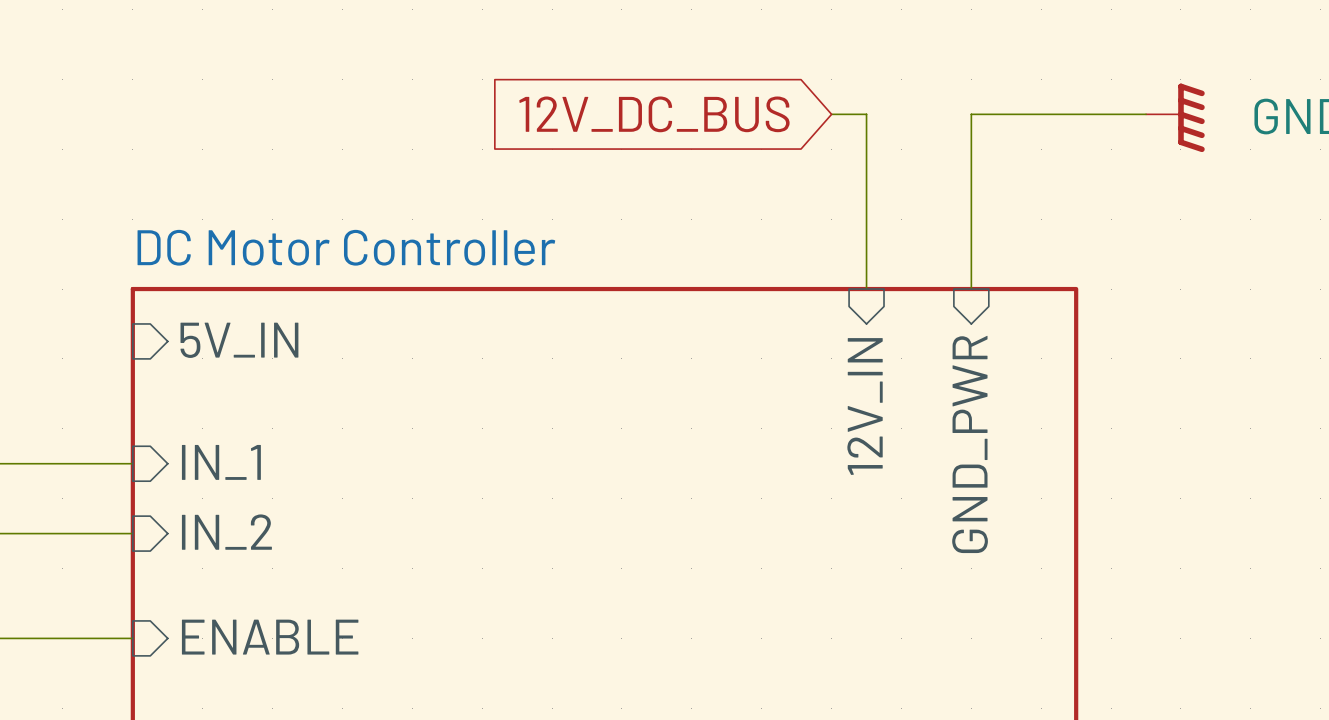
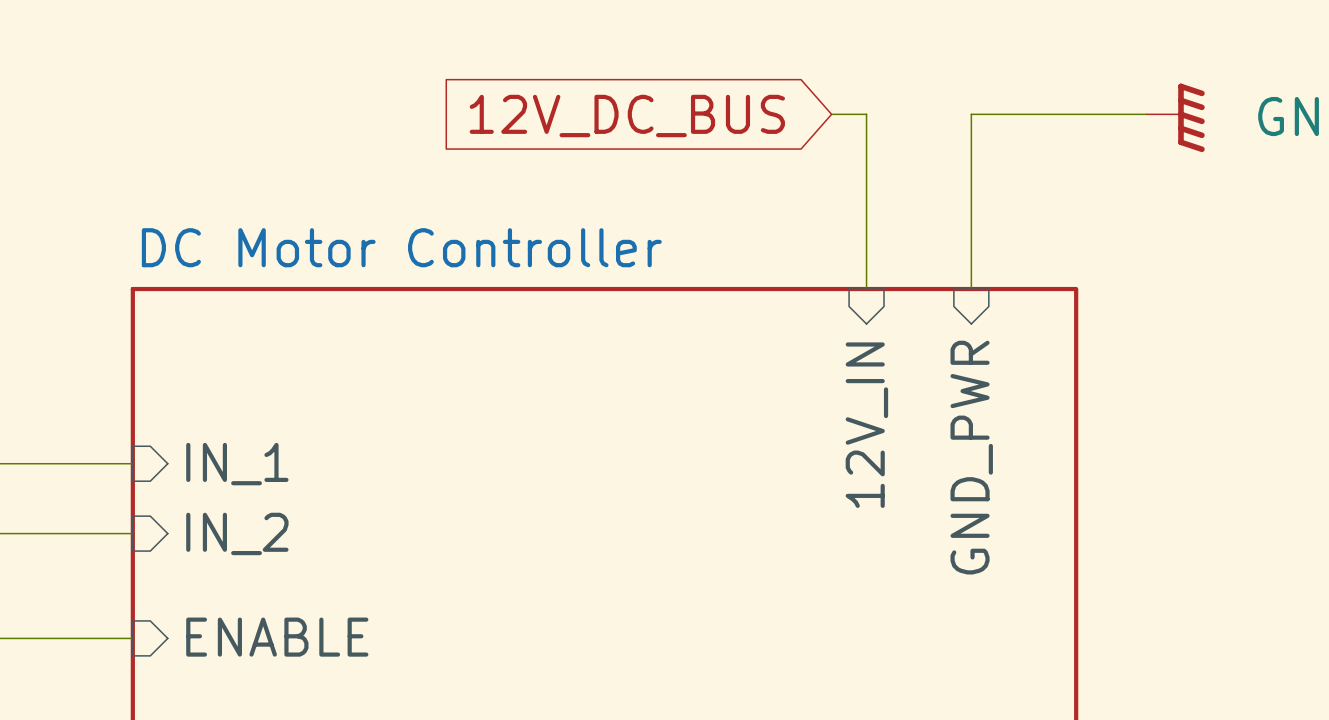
sheet pin: 5V_IN (239, 340) -> none

